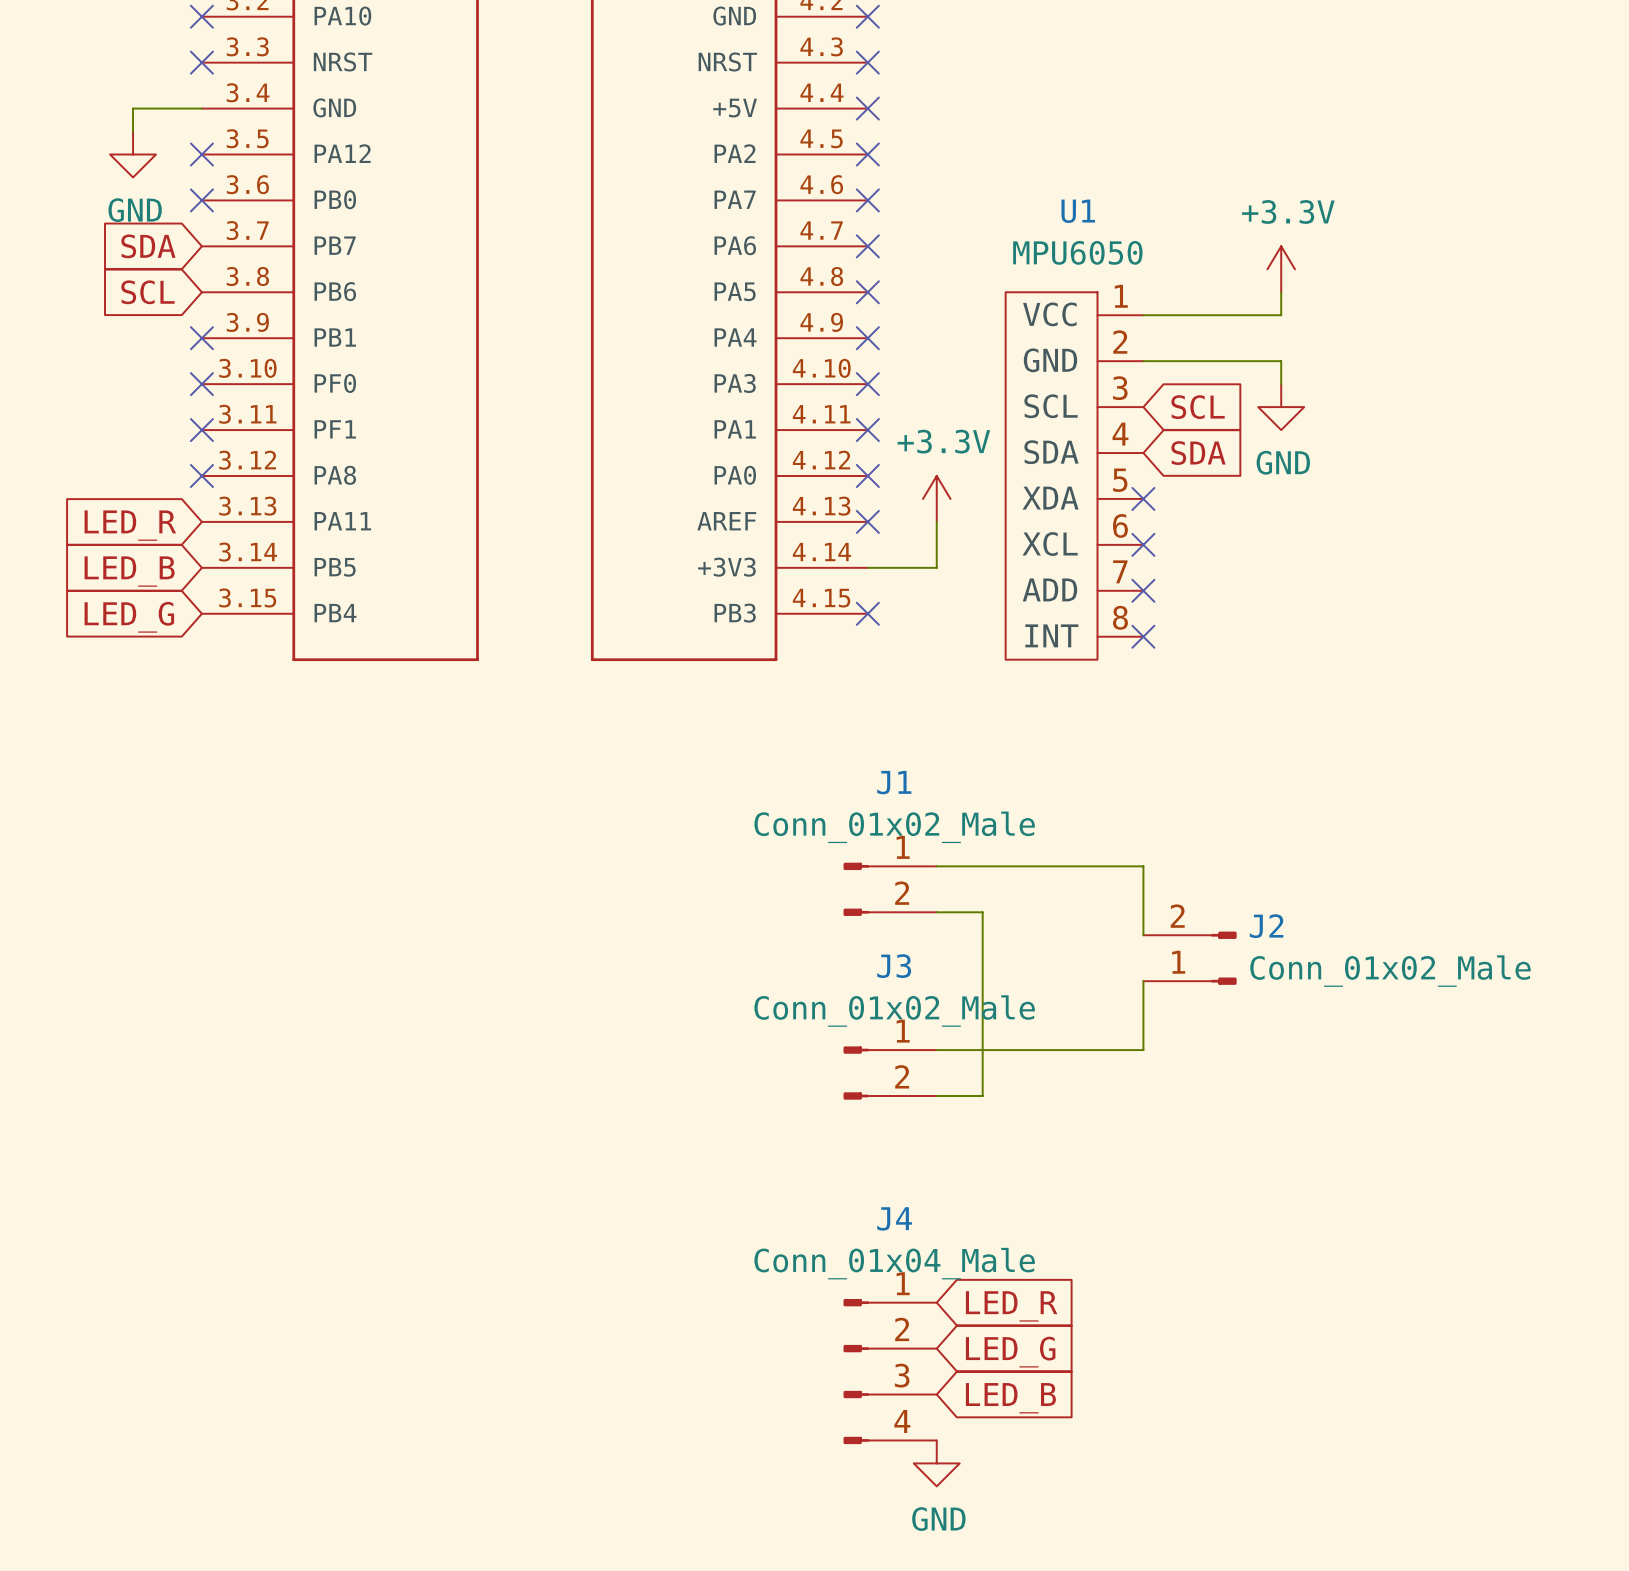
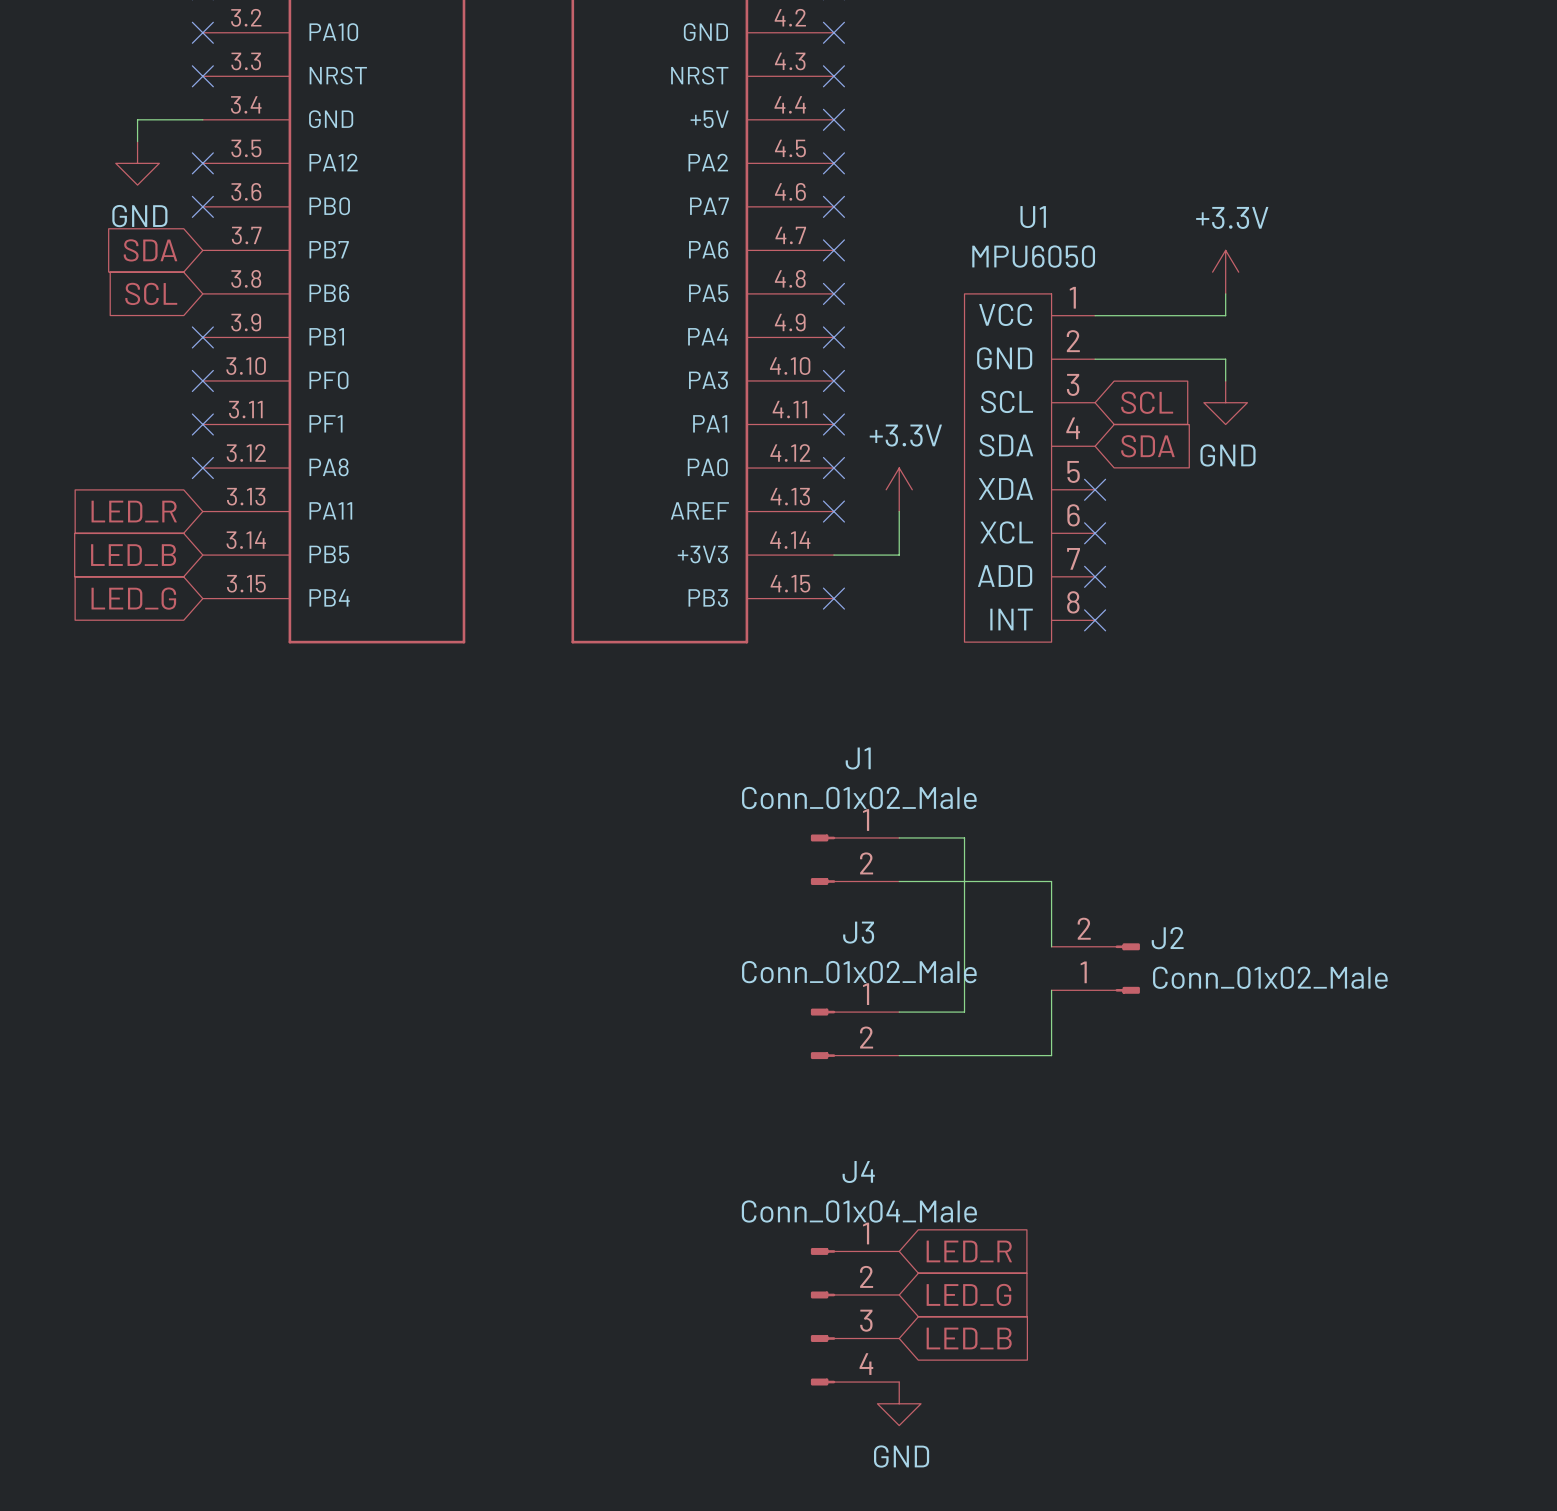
wire: (1005, 866) (1143, 866) (1143, 935) -> (964, 837) (964, 1012)
wire: (982, 912) (982, 1096) -> (942, 881) (1051, 881) (1051, 946)
J2 position: (1190, 958) -> (1095, 968)
wire: (1143, 981) (1143, 1050) (1005, 1050) -> none
wire: none -> (1051, 990) (1051, 1055) (942, 1055)

